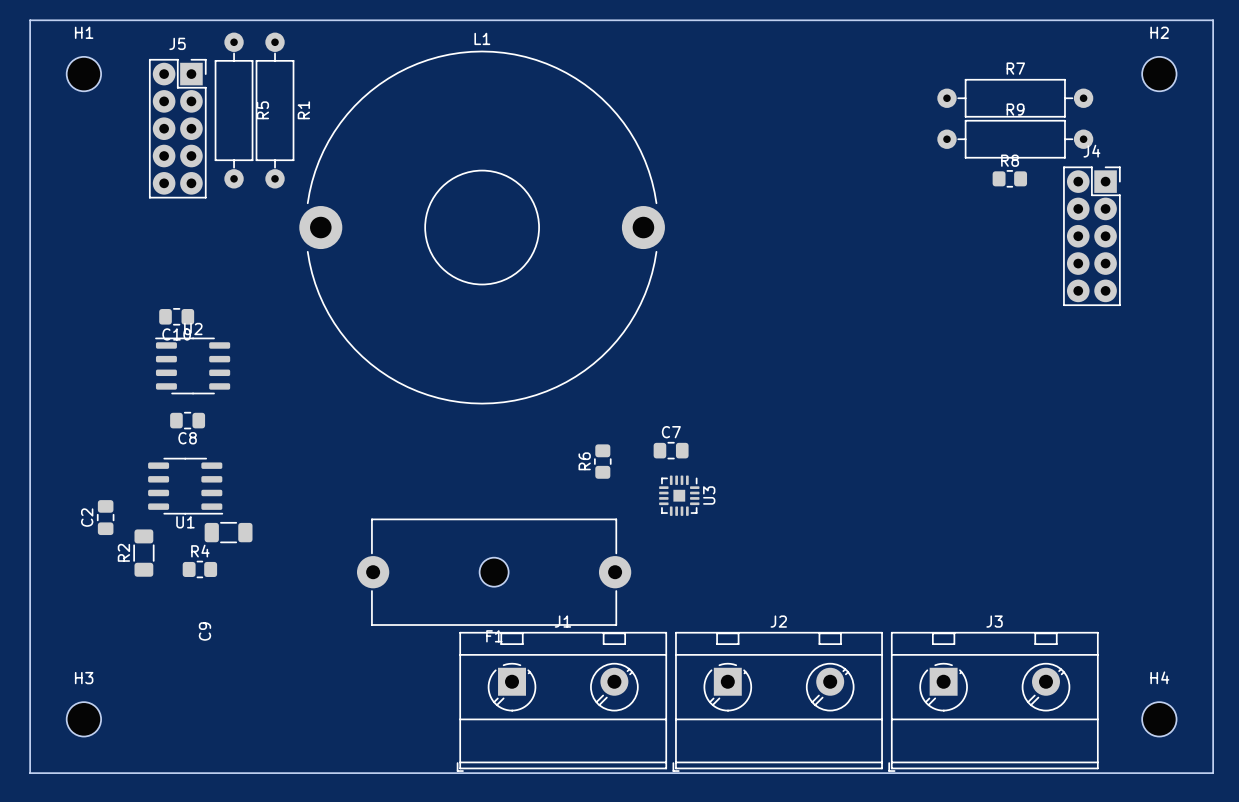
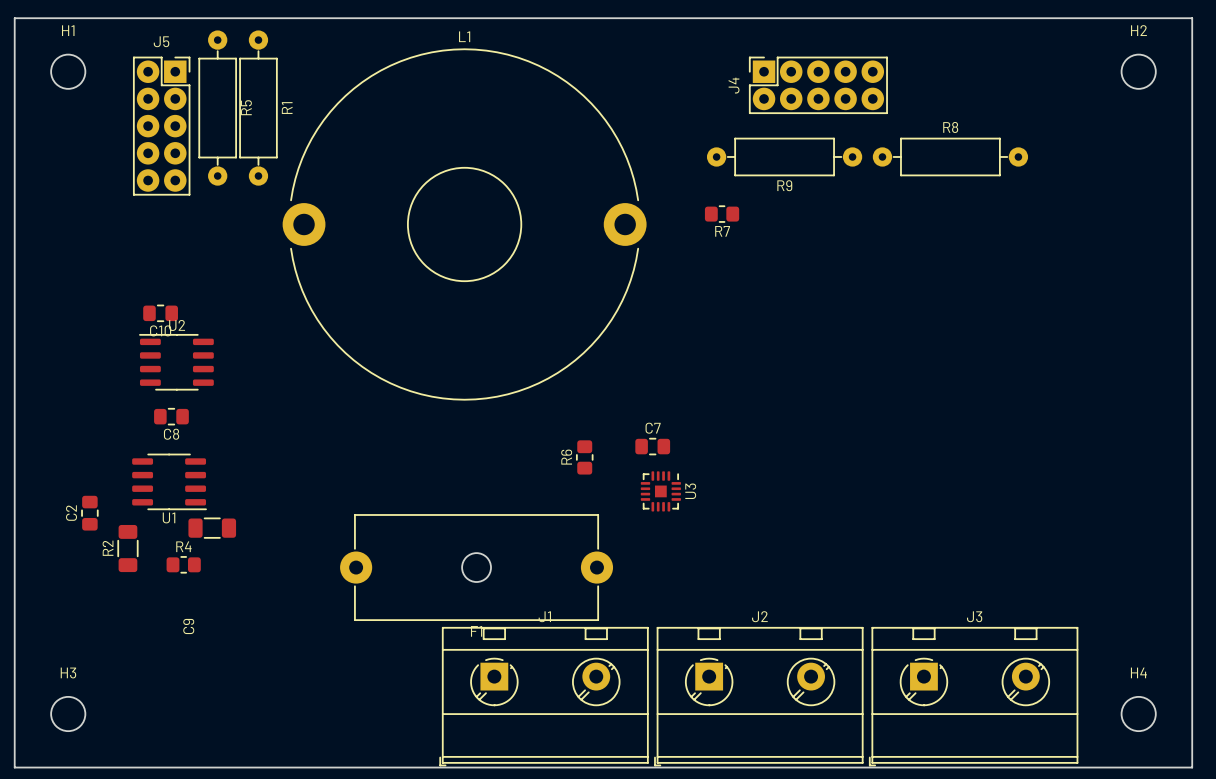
R7 name position: R7 (1015, 68) -> R7 (722, 231)
R7 footprint: [937, 79, 1094, 118] -> [704, 205, 740, 223]
R9 name position: R9 (1015, 109) -> R9 (784, 185)
R9 position: (1015, 139) -> (784, 156)
R8 footprint: [992, 170, 1028, 188] -> [872, 137, 1029, 177]
J4 rotation: 0° (1091, 236) -> 90° counterclockwise (818, 85)
J4 position: (1091, 236) -> (818, 85)

